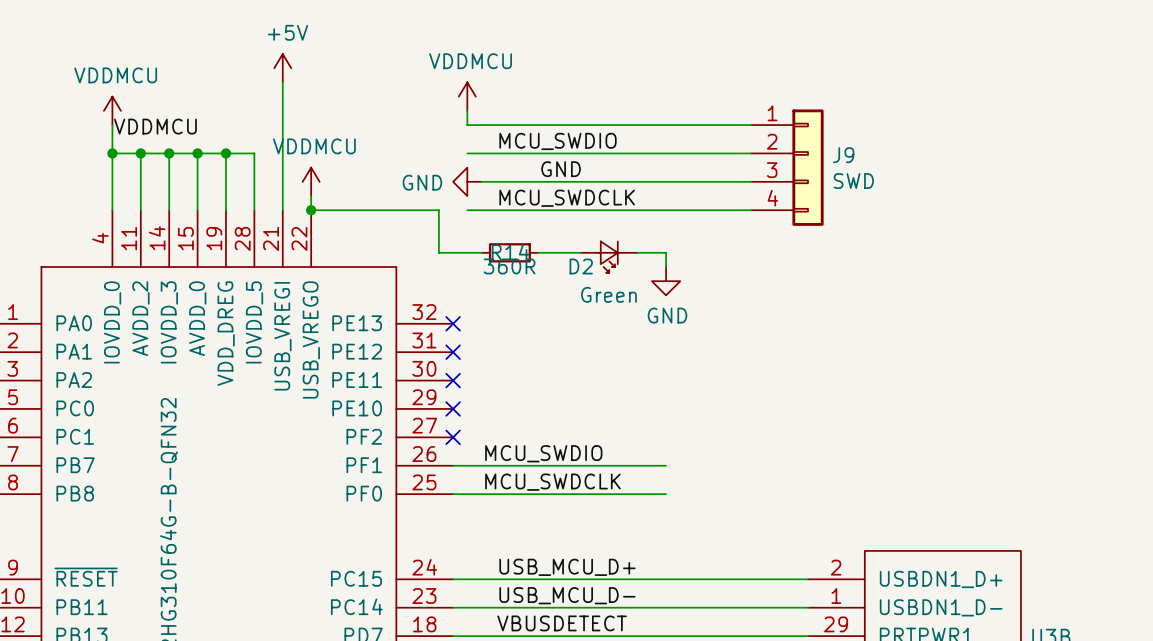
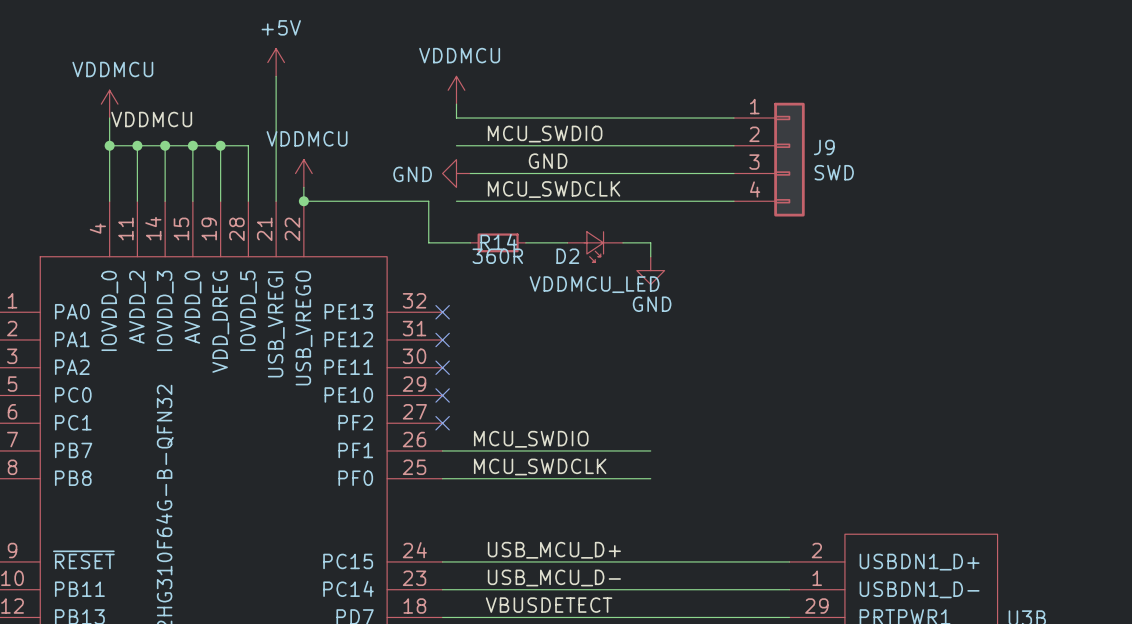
D2 value: Green (608, 294) -> VDDMCU_LED (594, 284)

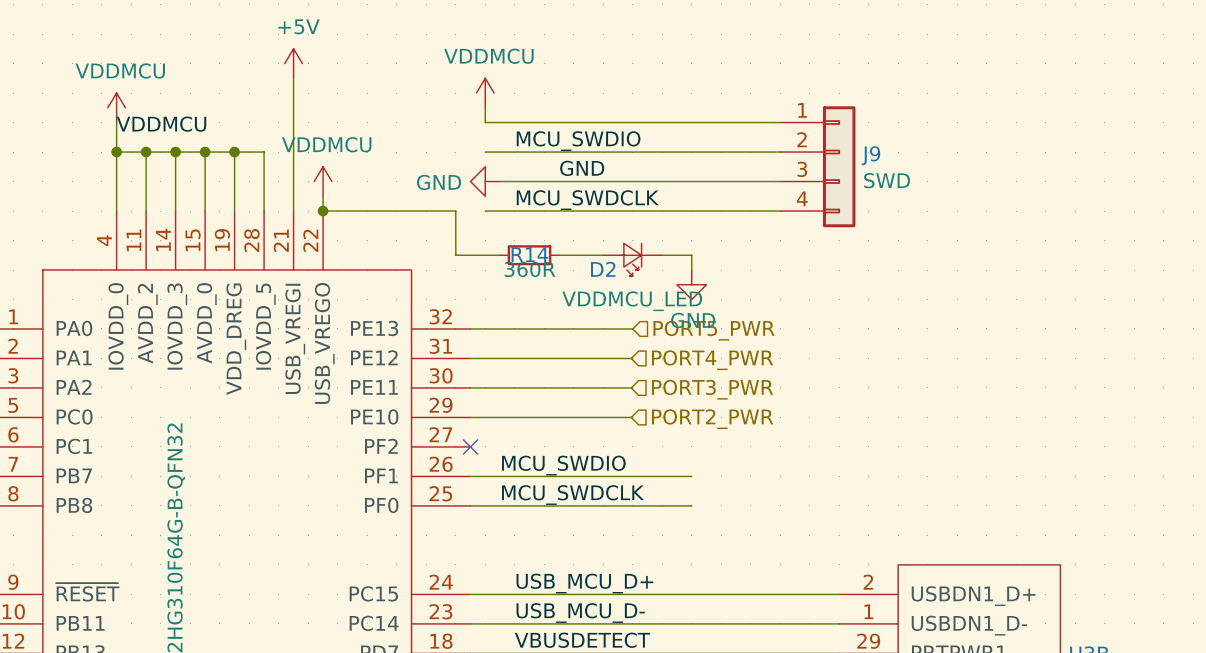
wire: none -> (470, 328) (632, 328)
no-connect mark: (442, 312) -> none
hierarchical label: none -> PORT5_PWR (714, 330)
wire: none -> (470, 358) (632, 358)
no-connect mark: (442, 339) -> none
hierarchical label: none -> PORT4_PWR (712, 360)
wire: none -> (470, 387) (632, 387)
no-connect mark: (442, 367) -> none
hierarchical label: none -> PORT3_PWR (712, 389)
wire: none -> (470, 417) (632, 417)
no-connect mark: (442, 395) -> none
hierarchical label: none -> PORT2_PWR (712, 419)

